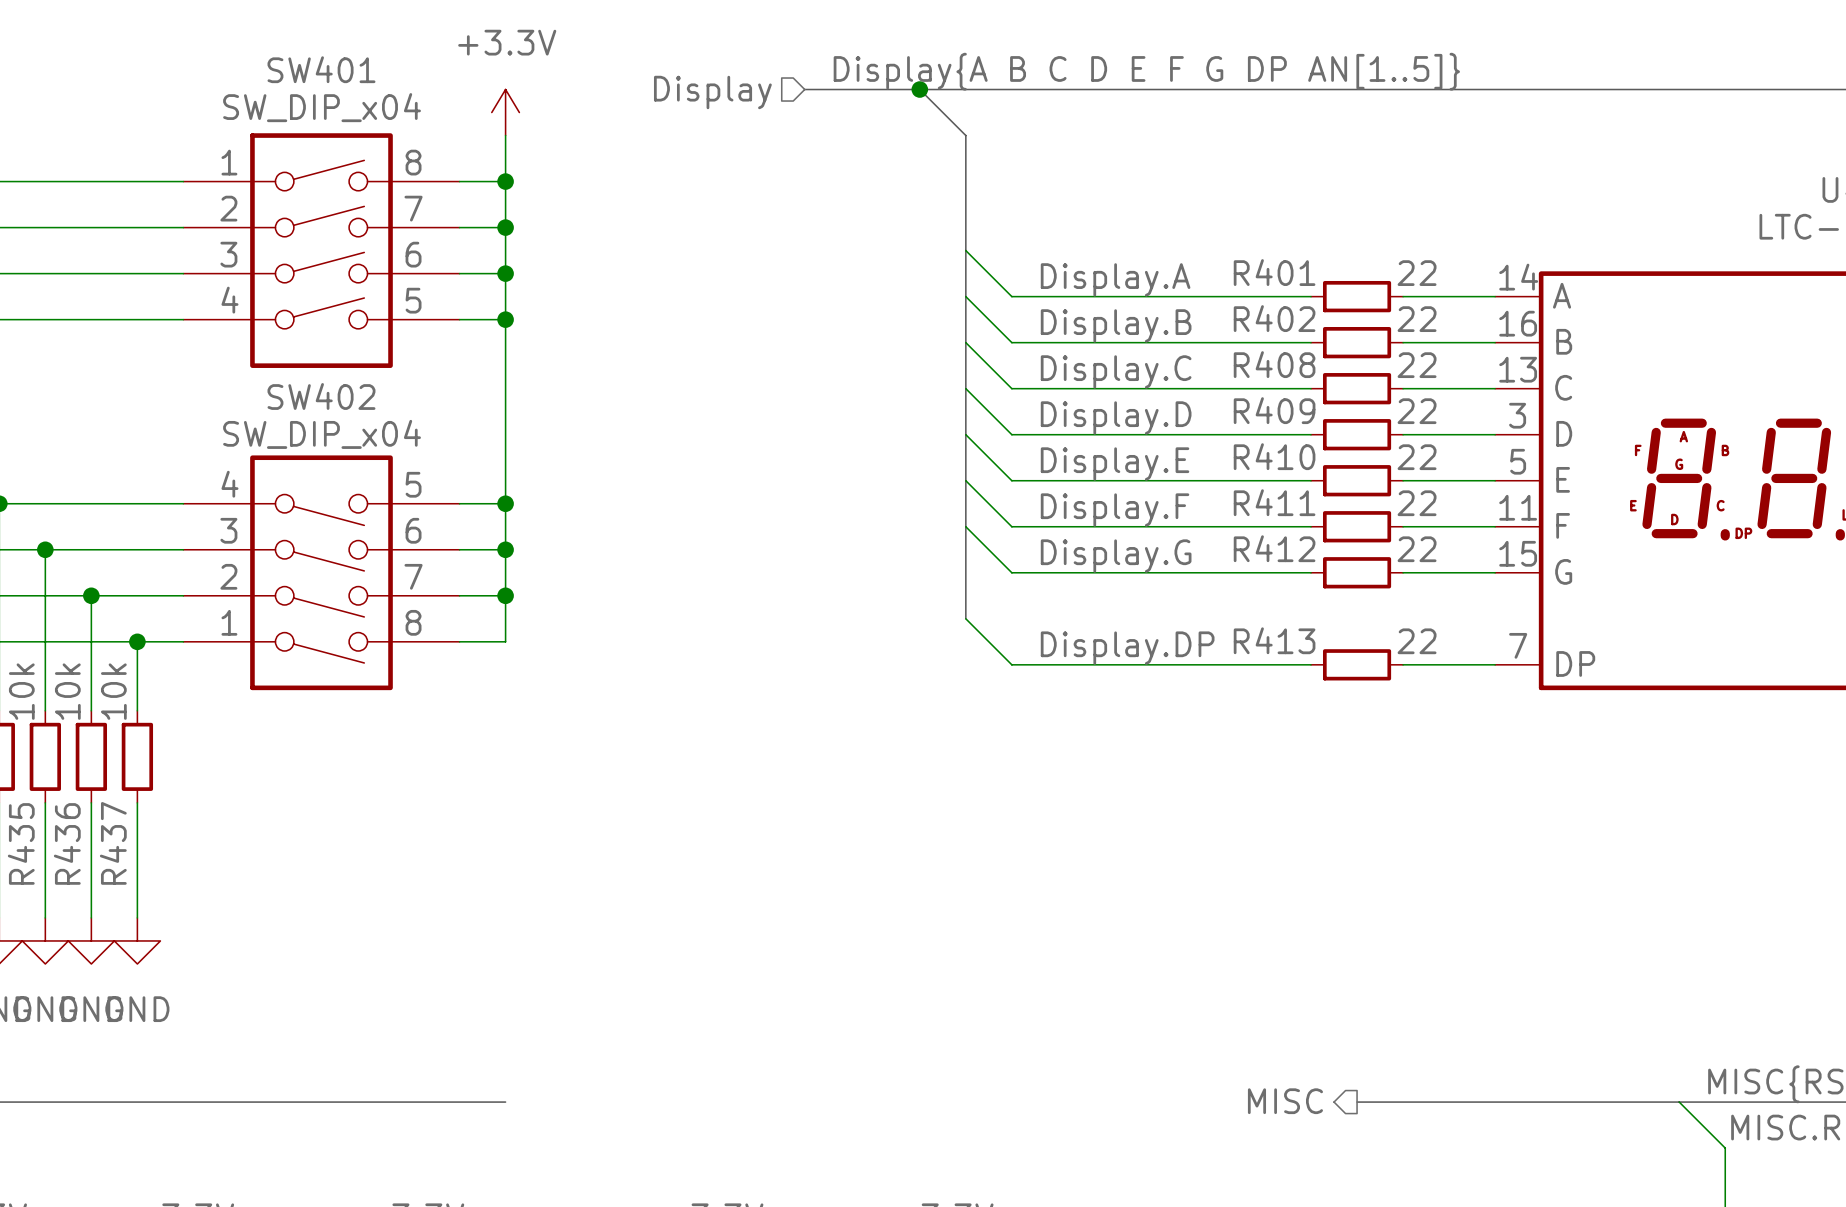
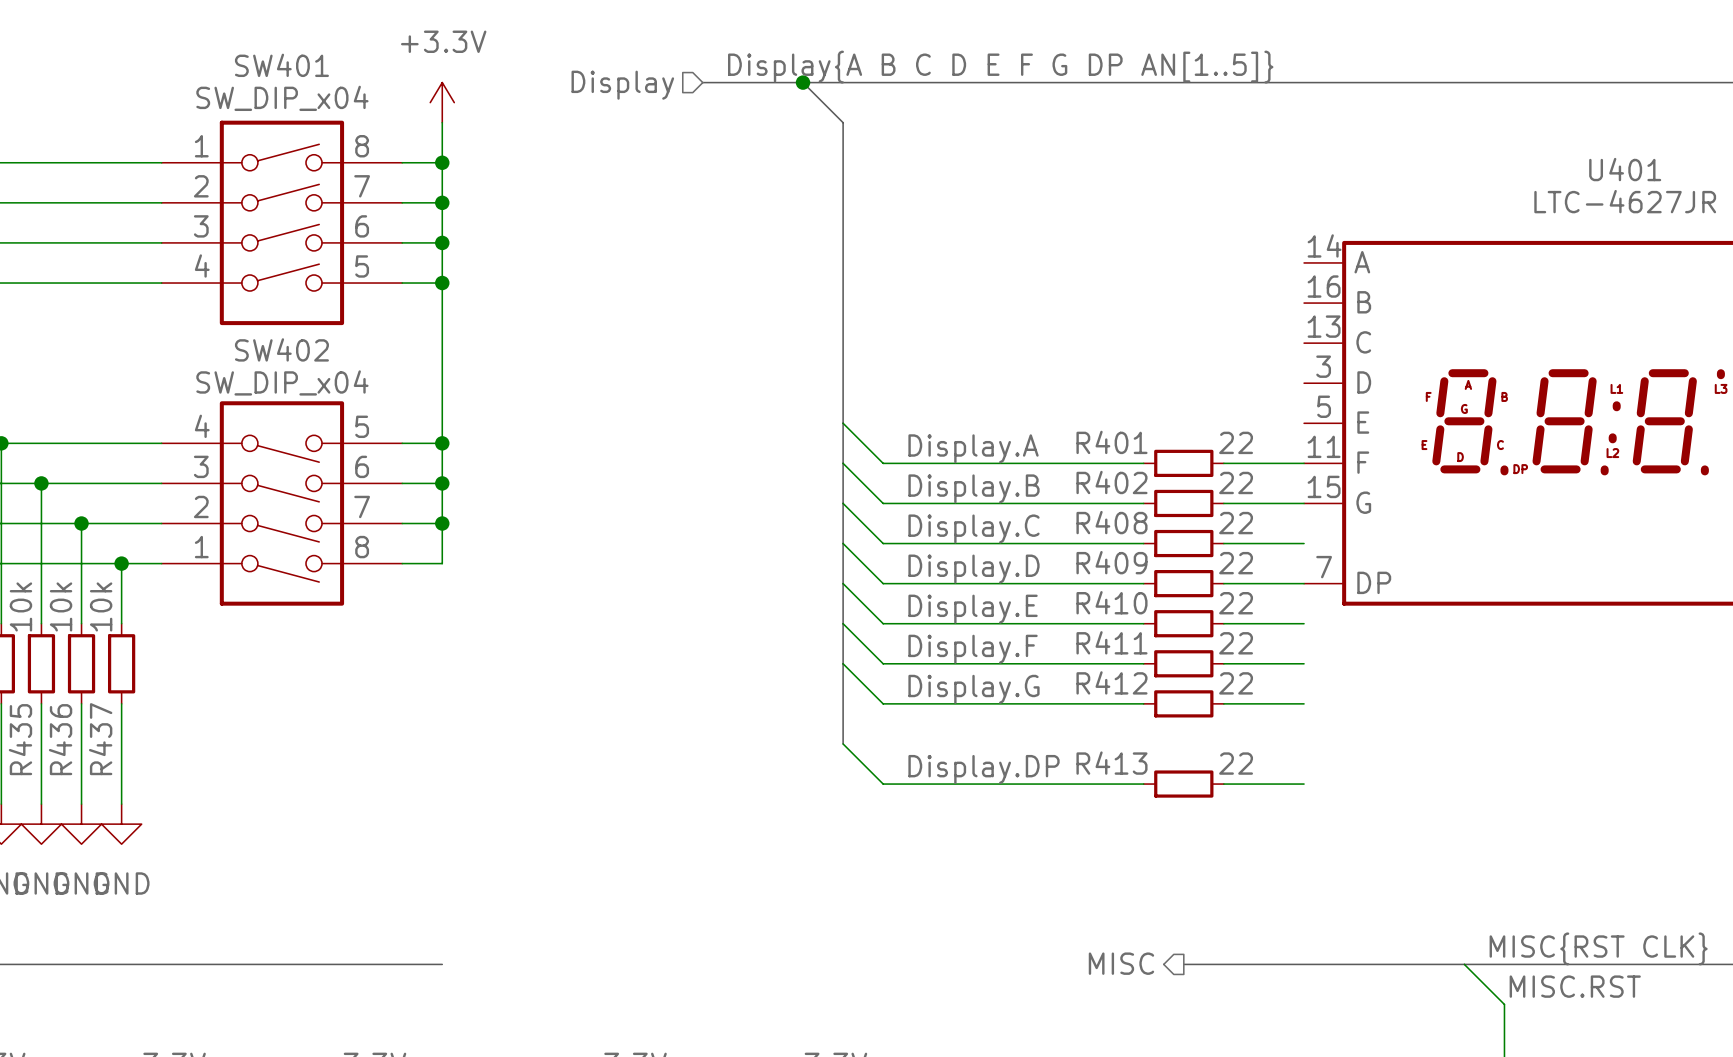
wire: (965, 250) (1011, 296) (1311, 296) -> none
label: Display.A (1115, 279) -> none
wire: (965, 296) (1011, 342) (1311, 342) -> none
R401: 22 (1357, 296) -> none
wire: (1403, 296) (1495, 296) -> none
label: Display.B (1116, 325) -> none
wire: (965, 342) (1011, 388) (1311, 388) -> (843, 503) (883, 543) (1143, 543)
R402: 22 (1357, 342) -> none
wire: (1403, 342) (1495, 342) -> none
label position: Display.C (1116, 371) -> Display.C (974, 529)
wire: (965, 388) (1011, 434) (1311, 434) -> (843, 623) (883, 663) (1143, 663)
R408 position: (1357, 388) -> (1183, 543)
wire: (1403, 388) (1495, 388) -> (1223, 543) (1304, 543)
label: Display.D (1116, 418) -> none
wire: (965, 434) (1011, 480) (1311, 480) -> (843, 583) (883, 623) (1143, 623)
R409: 22 (1357, 434) -> none
wire: (1403, 434) (1495, 434) -> (1223, 663) (1304, 663)
label position: Display.E (1115, 464) -> Display.E (973, 609)
R410 position: (1357, 480) -> (1183, 623)
wire: (1403, 480) (1495, 480) -> (1223, 623) (1304, 623)
R411 name: R411 (1274, 502) -> R401 (1111, 442)
label: Display.F (1115, 510) -> Display.A (973, 448)
R412 name: R412 (1274, 548) -> R402 (1111, 482)
label: Display.G (1116, 556) -> Display.B (974, 488)
bus: none -> (843, 543) (843, 743)
R413 name: R413 (1274, 640) -> R409 (1111, 562)
label: Display.DP (1127, 648) -> Display.D (974, 569)
label: none -> Display.F (973, 649)
wire: none -> (843, 663) (883, 703) (1143, 703)
R411: none -> 22 (1183, 663)
label: none -> Display.G (974, 689)
R412: none -> 22 (1183, 703)
wire: none -> (1223, 703) (1304, 703)
wire: none -> (843, 743) (883, 784) (1143, 784)
label: none -> Display.DP (984, 769)
R413: none -> 22 (1183, 784)
wire: none -> (1223, 784) (1304, 784)

